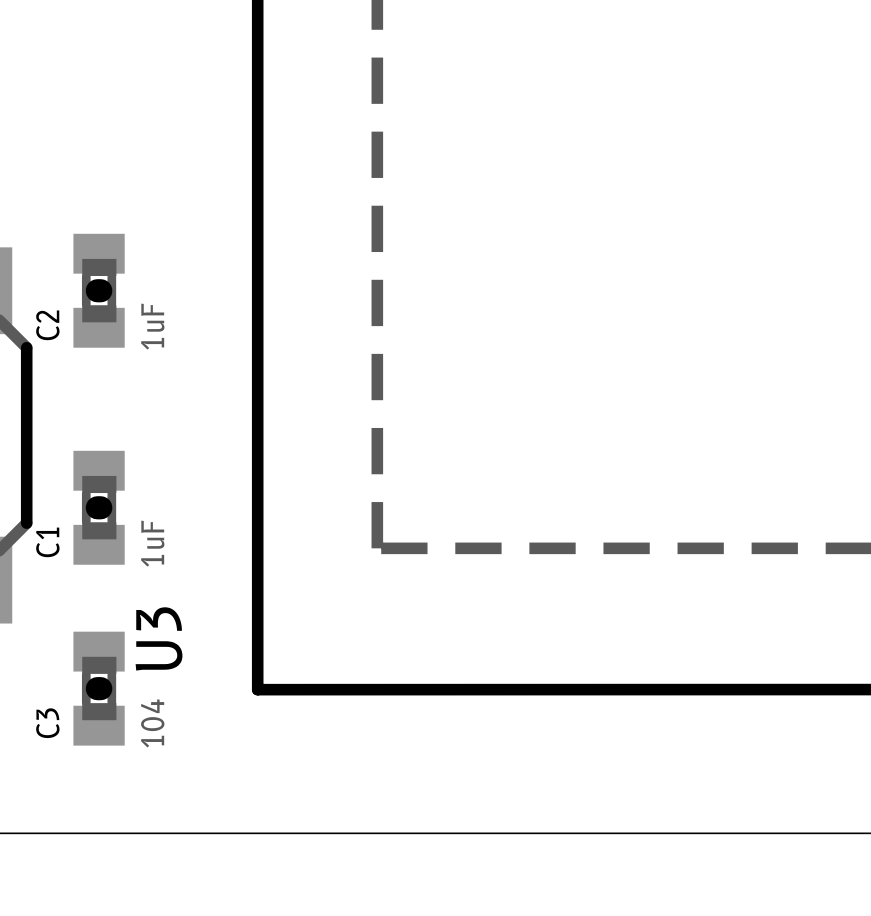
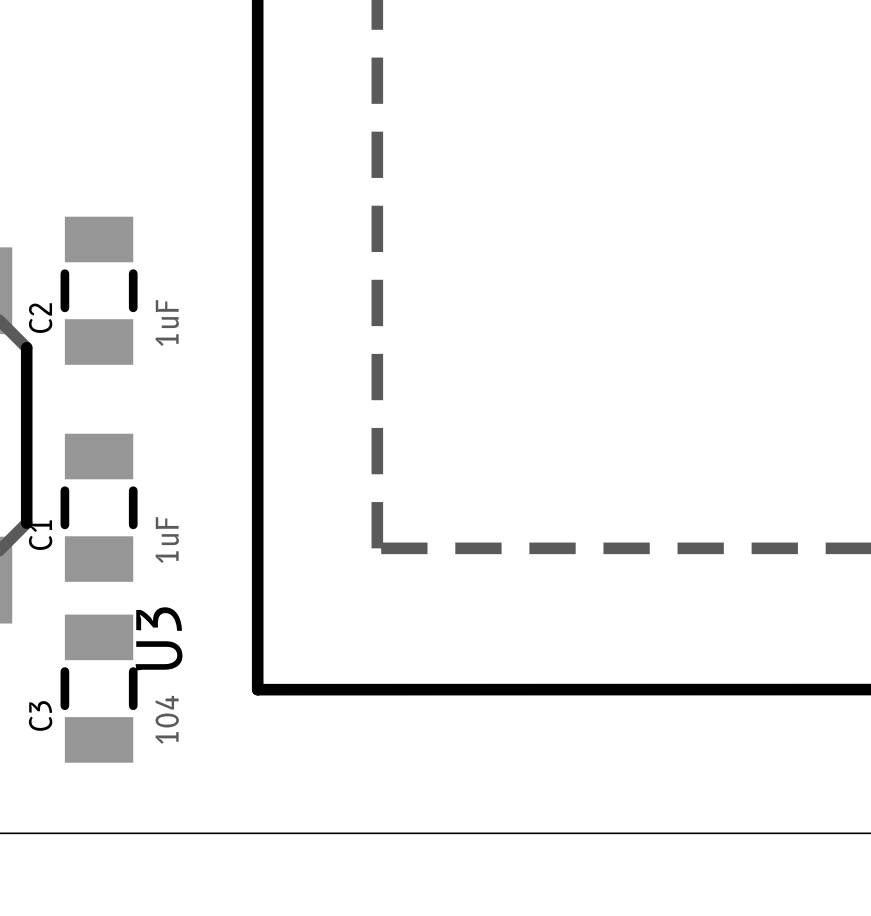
C2 footprint: [73, 233, 125, 348] -> [60, 216, 138, 365]
C1 footprint: [73, 450, 125, 565] -> [60, 433, 138, 582]
C3 footprint: [73, 631, 125, 746] -> [60, 614, 138, 763]

